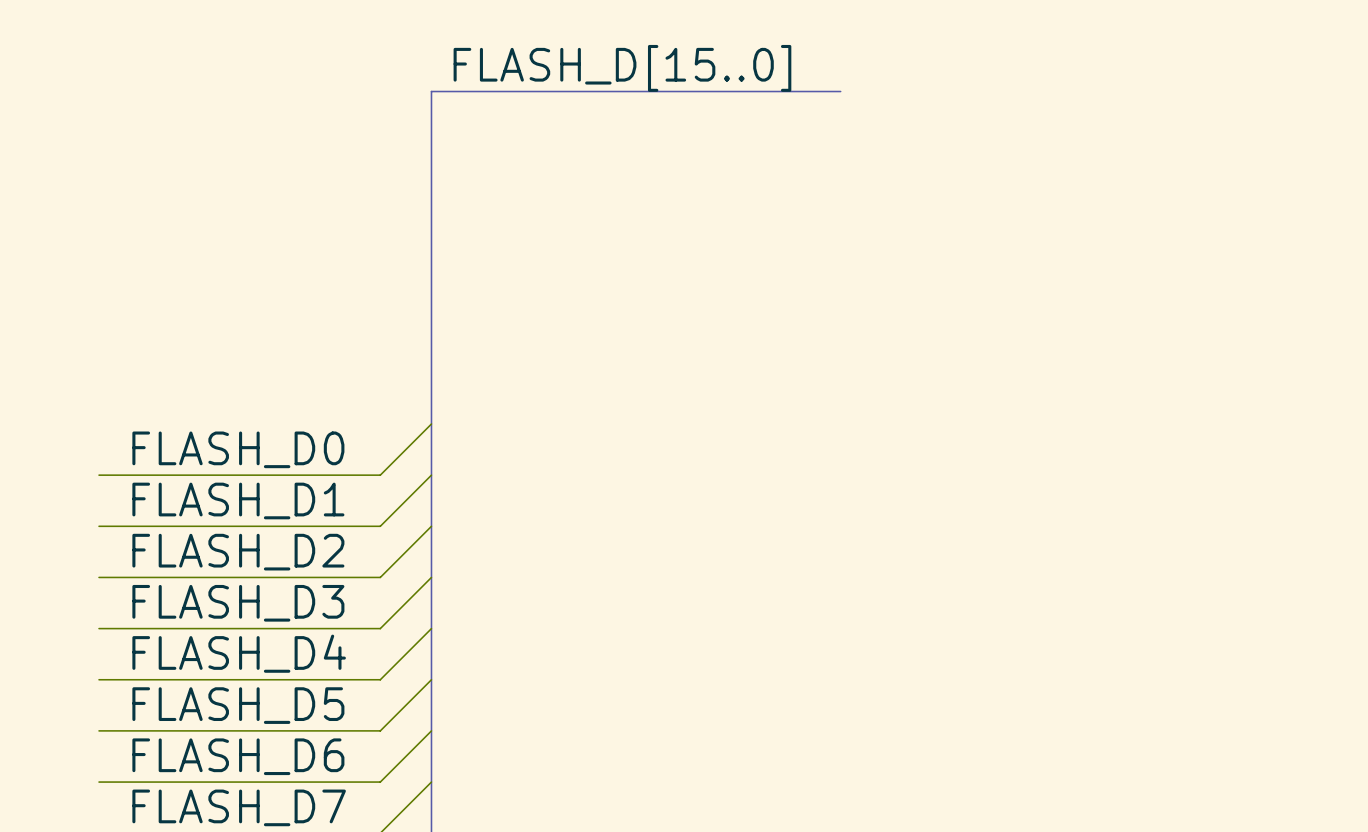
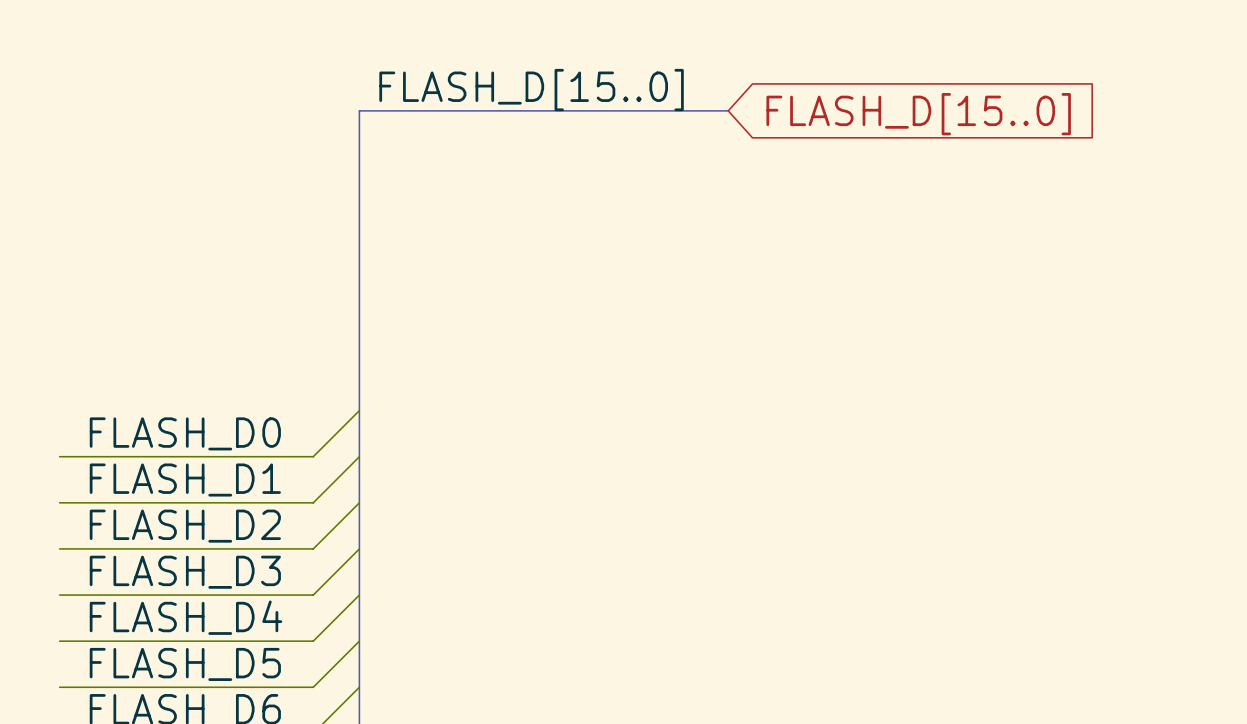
global label: none -> FLASH_D[15..0] (918, 114)

